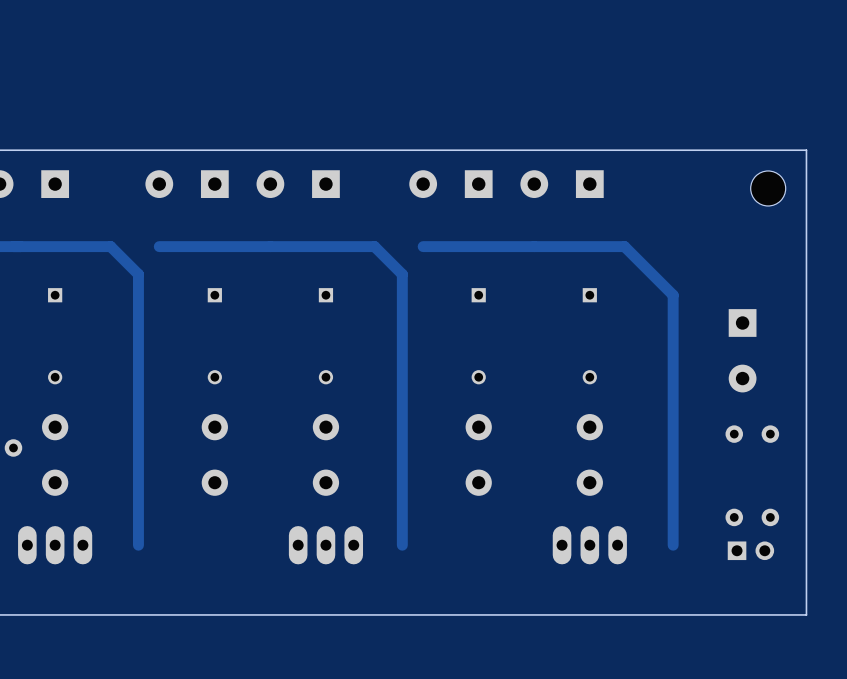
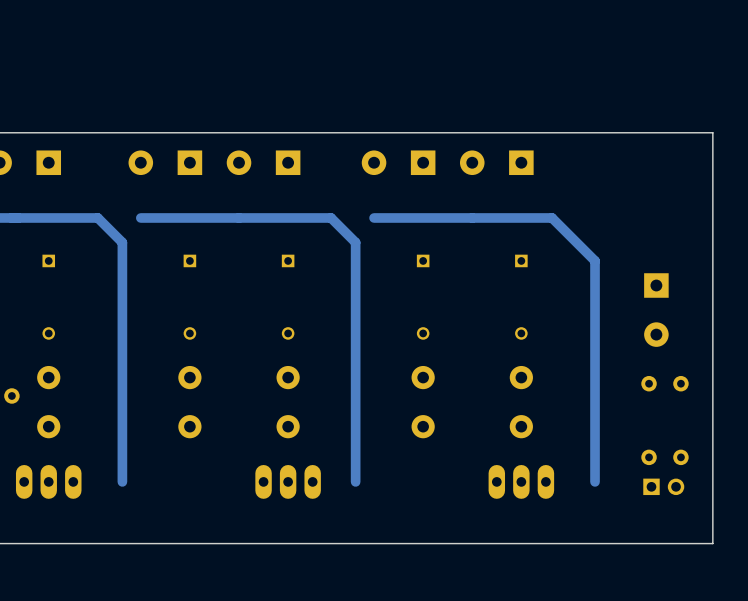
part: (768, 188) -> none

